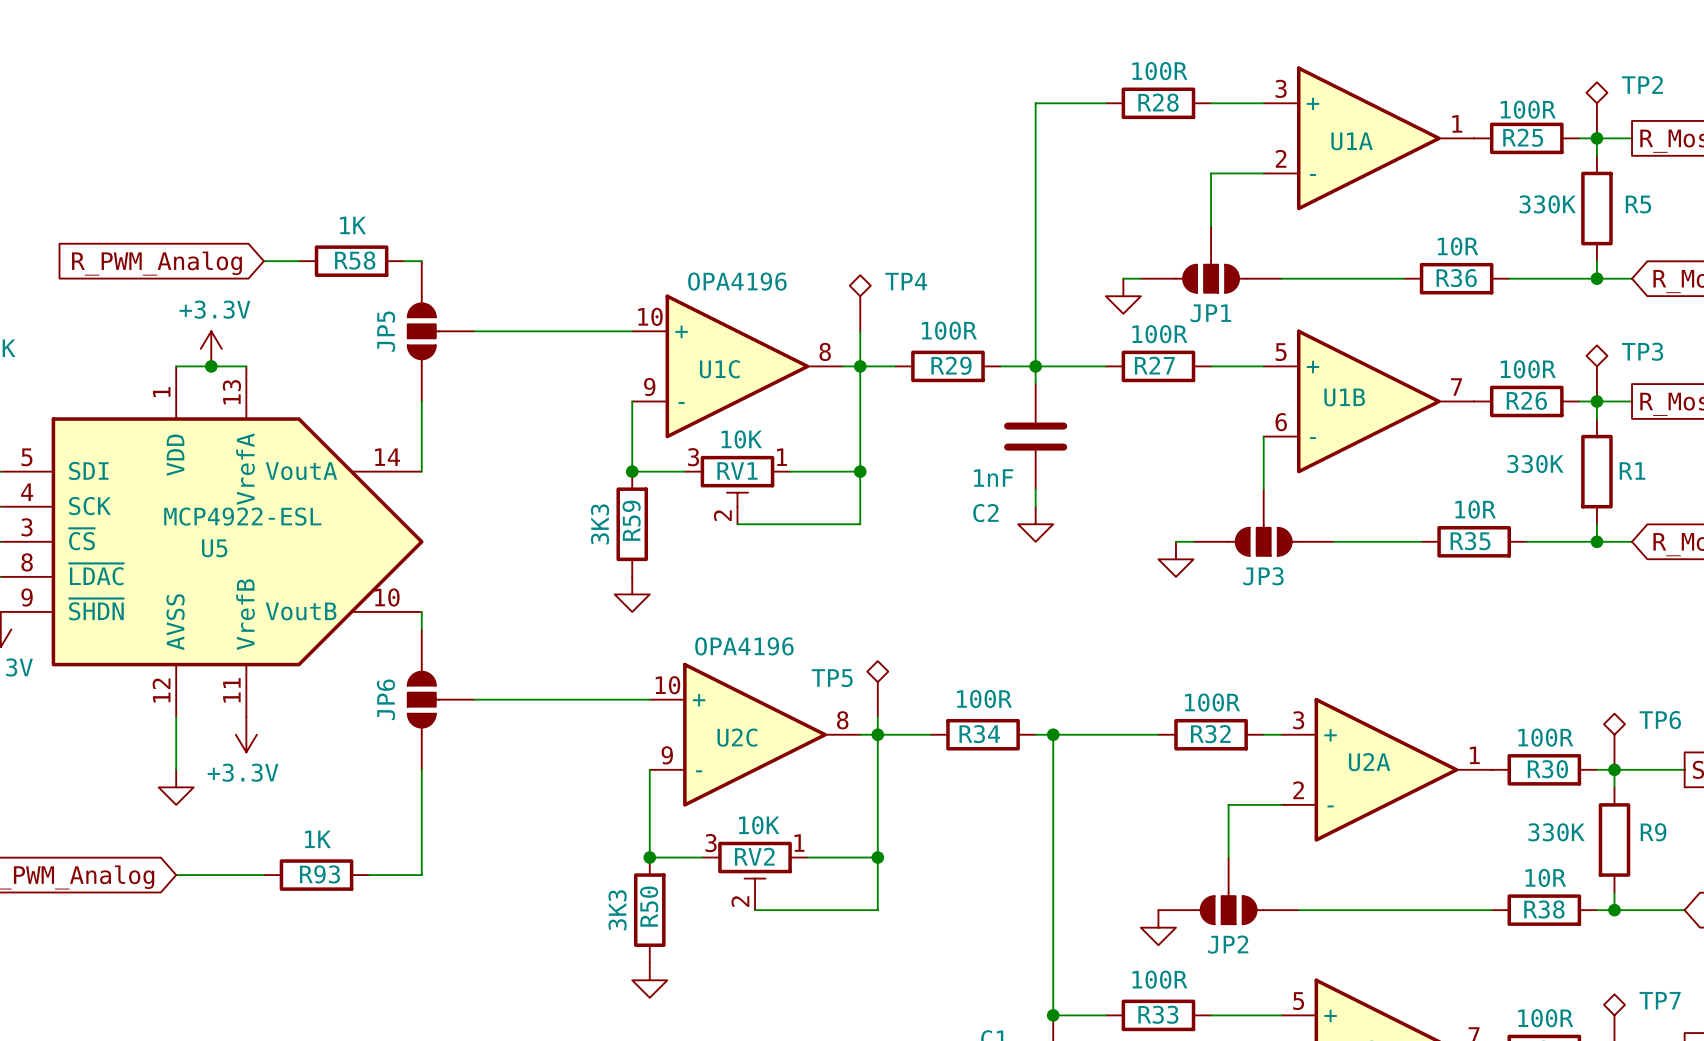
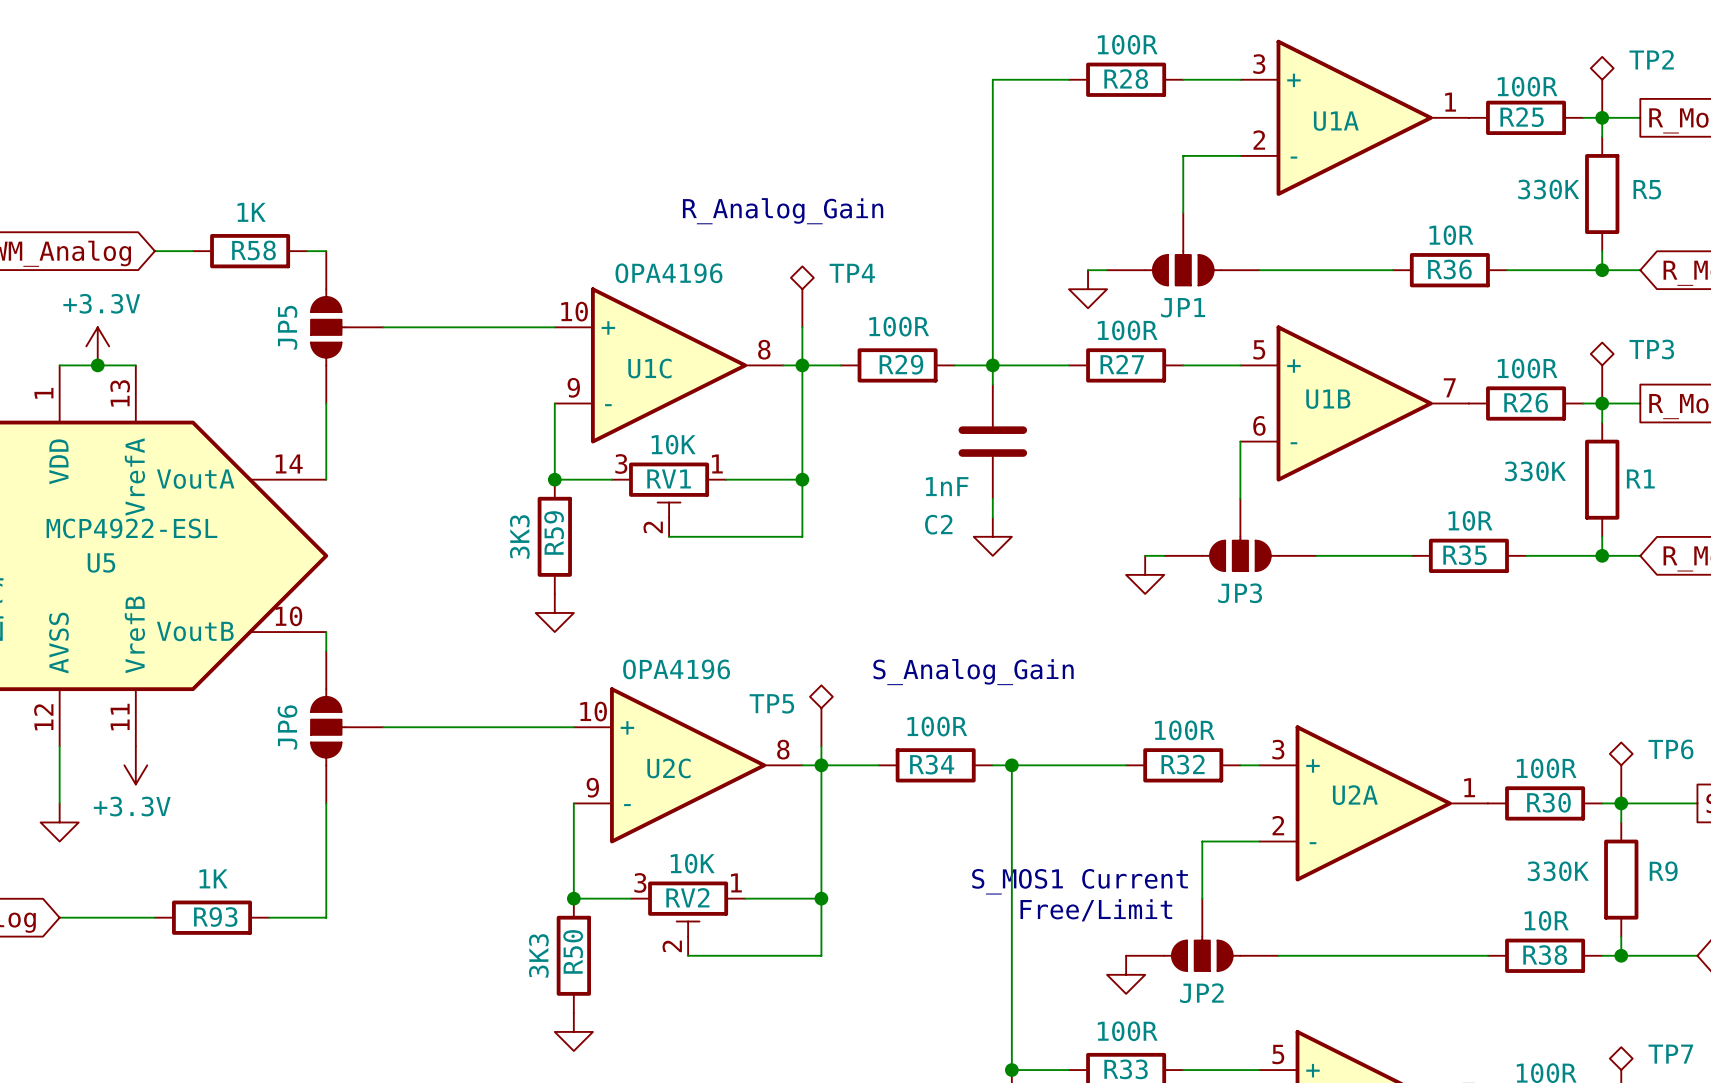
text: none -> R_Analog_Gain (783, 211)
text: none -> S_Analog_Gain (973, 672)
text: none -> S_MOS1 Current (1080, 881)
text: none -> Free/Limit (1096, 910)

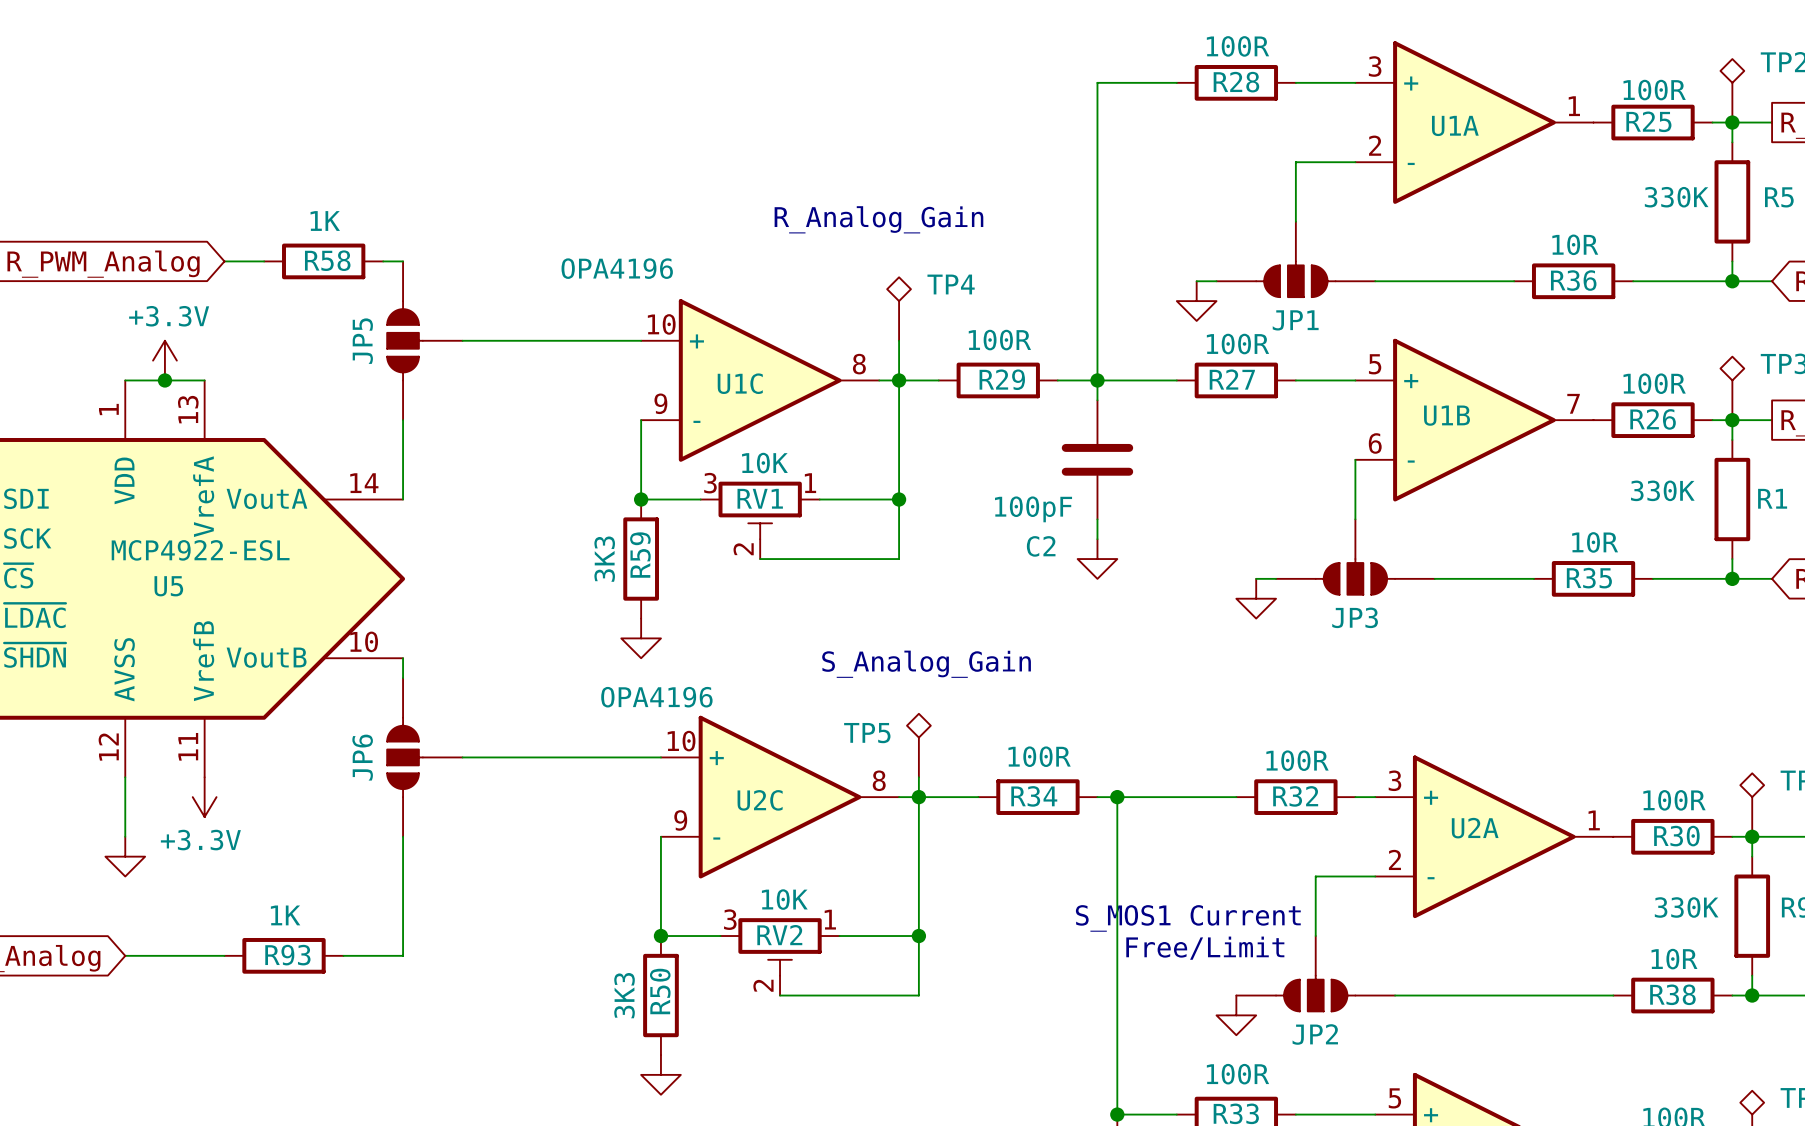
U1C text position: OPA4196 (668, 273) -> OPA4196 (617, 268)
C2 value: 1nF (947, 486) -> 100pF (1033, 509)
U2C text position: OPA4196 (676, 669) -> OPA4196 (656, 697)
text position: S_Analog_Gain (973, 672) -> S_Analog_Gain (926, 664)

